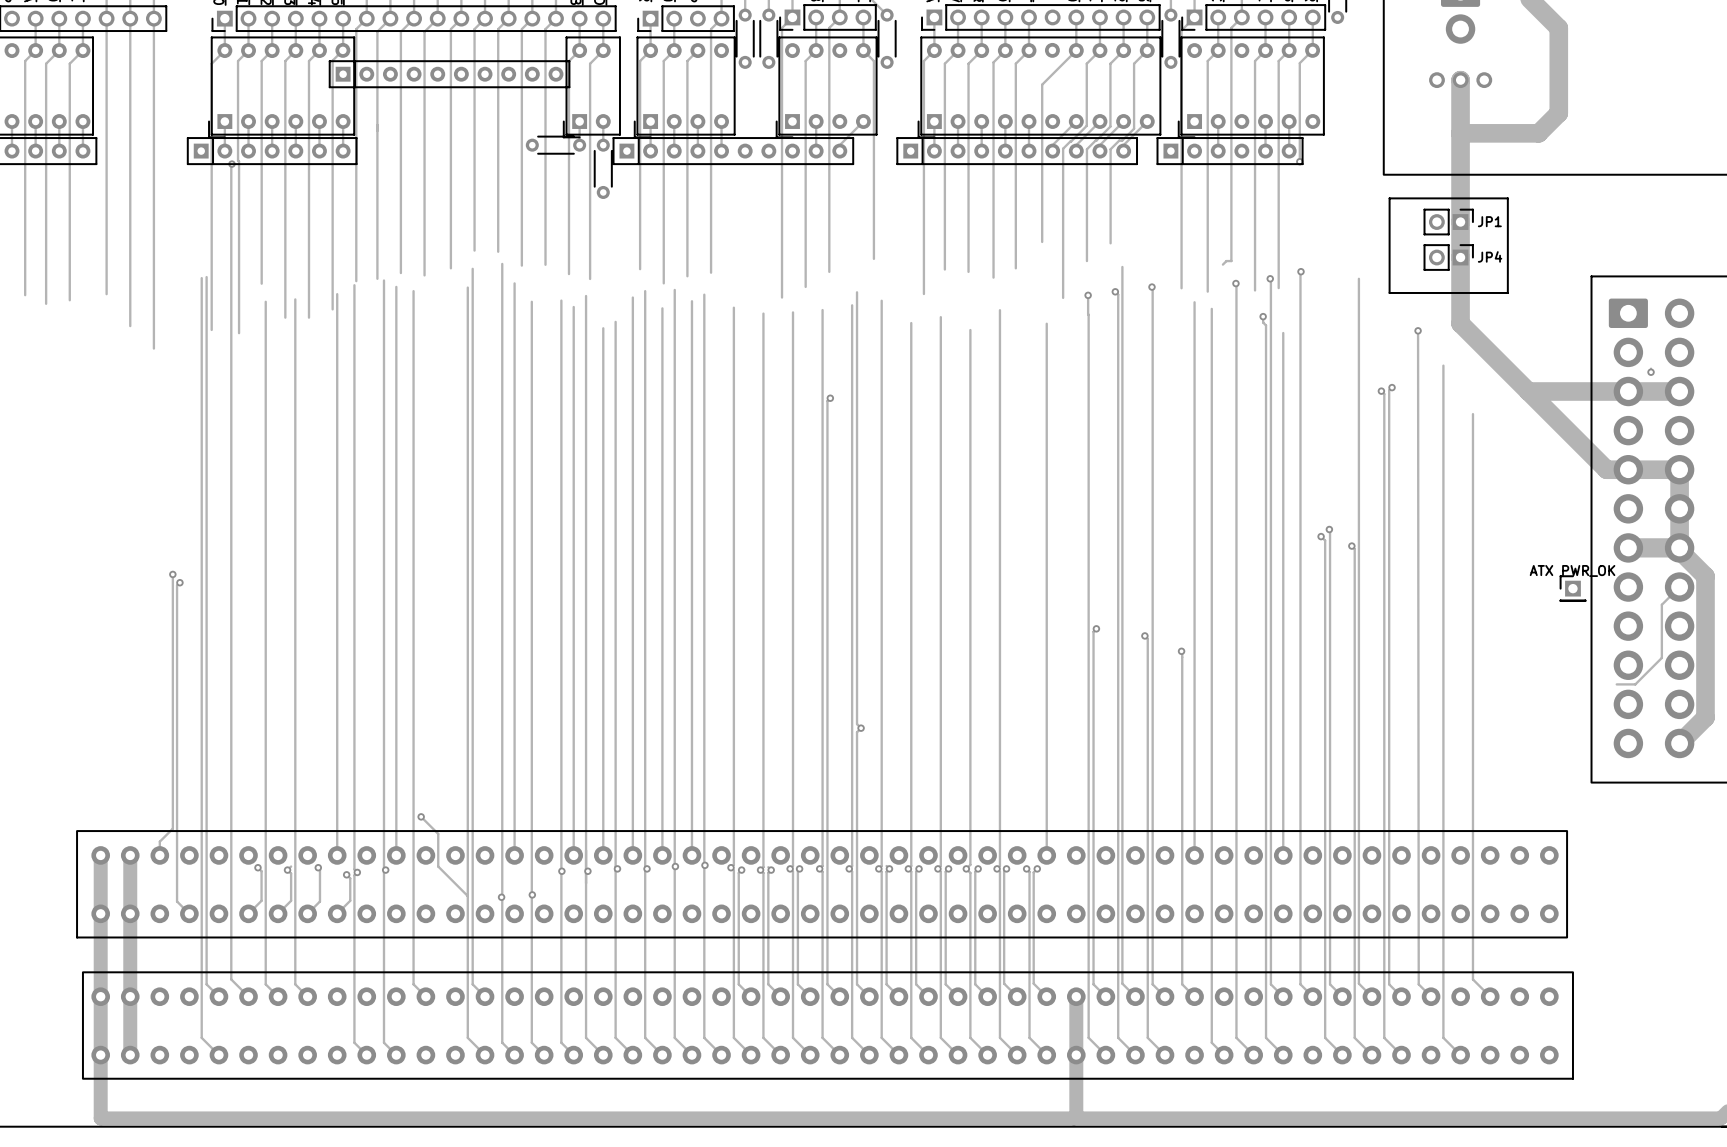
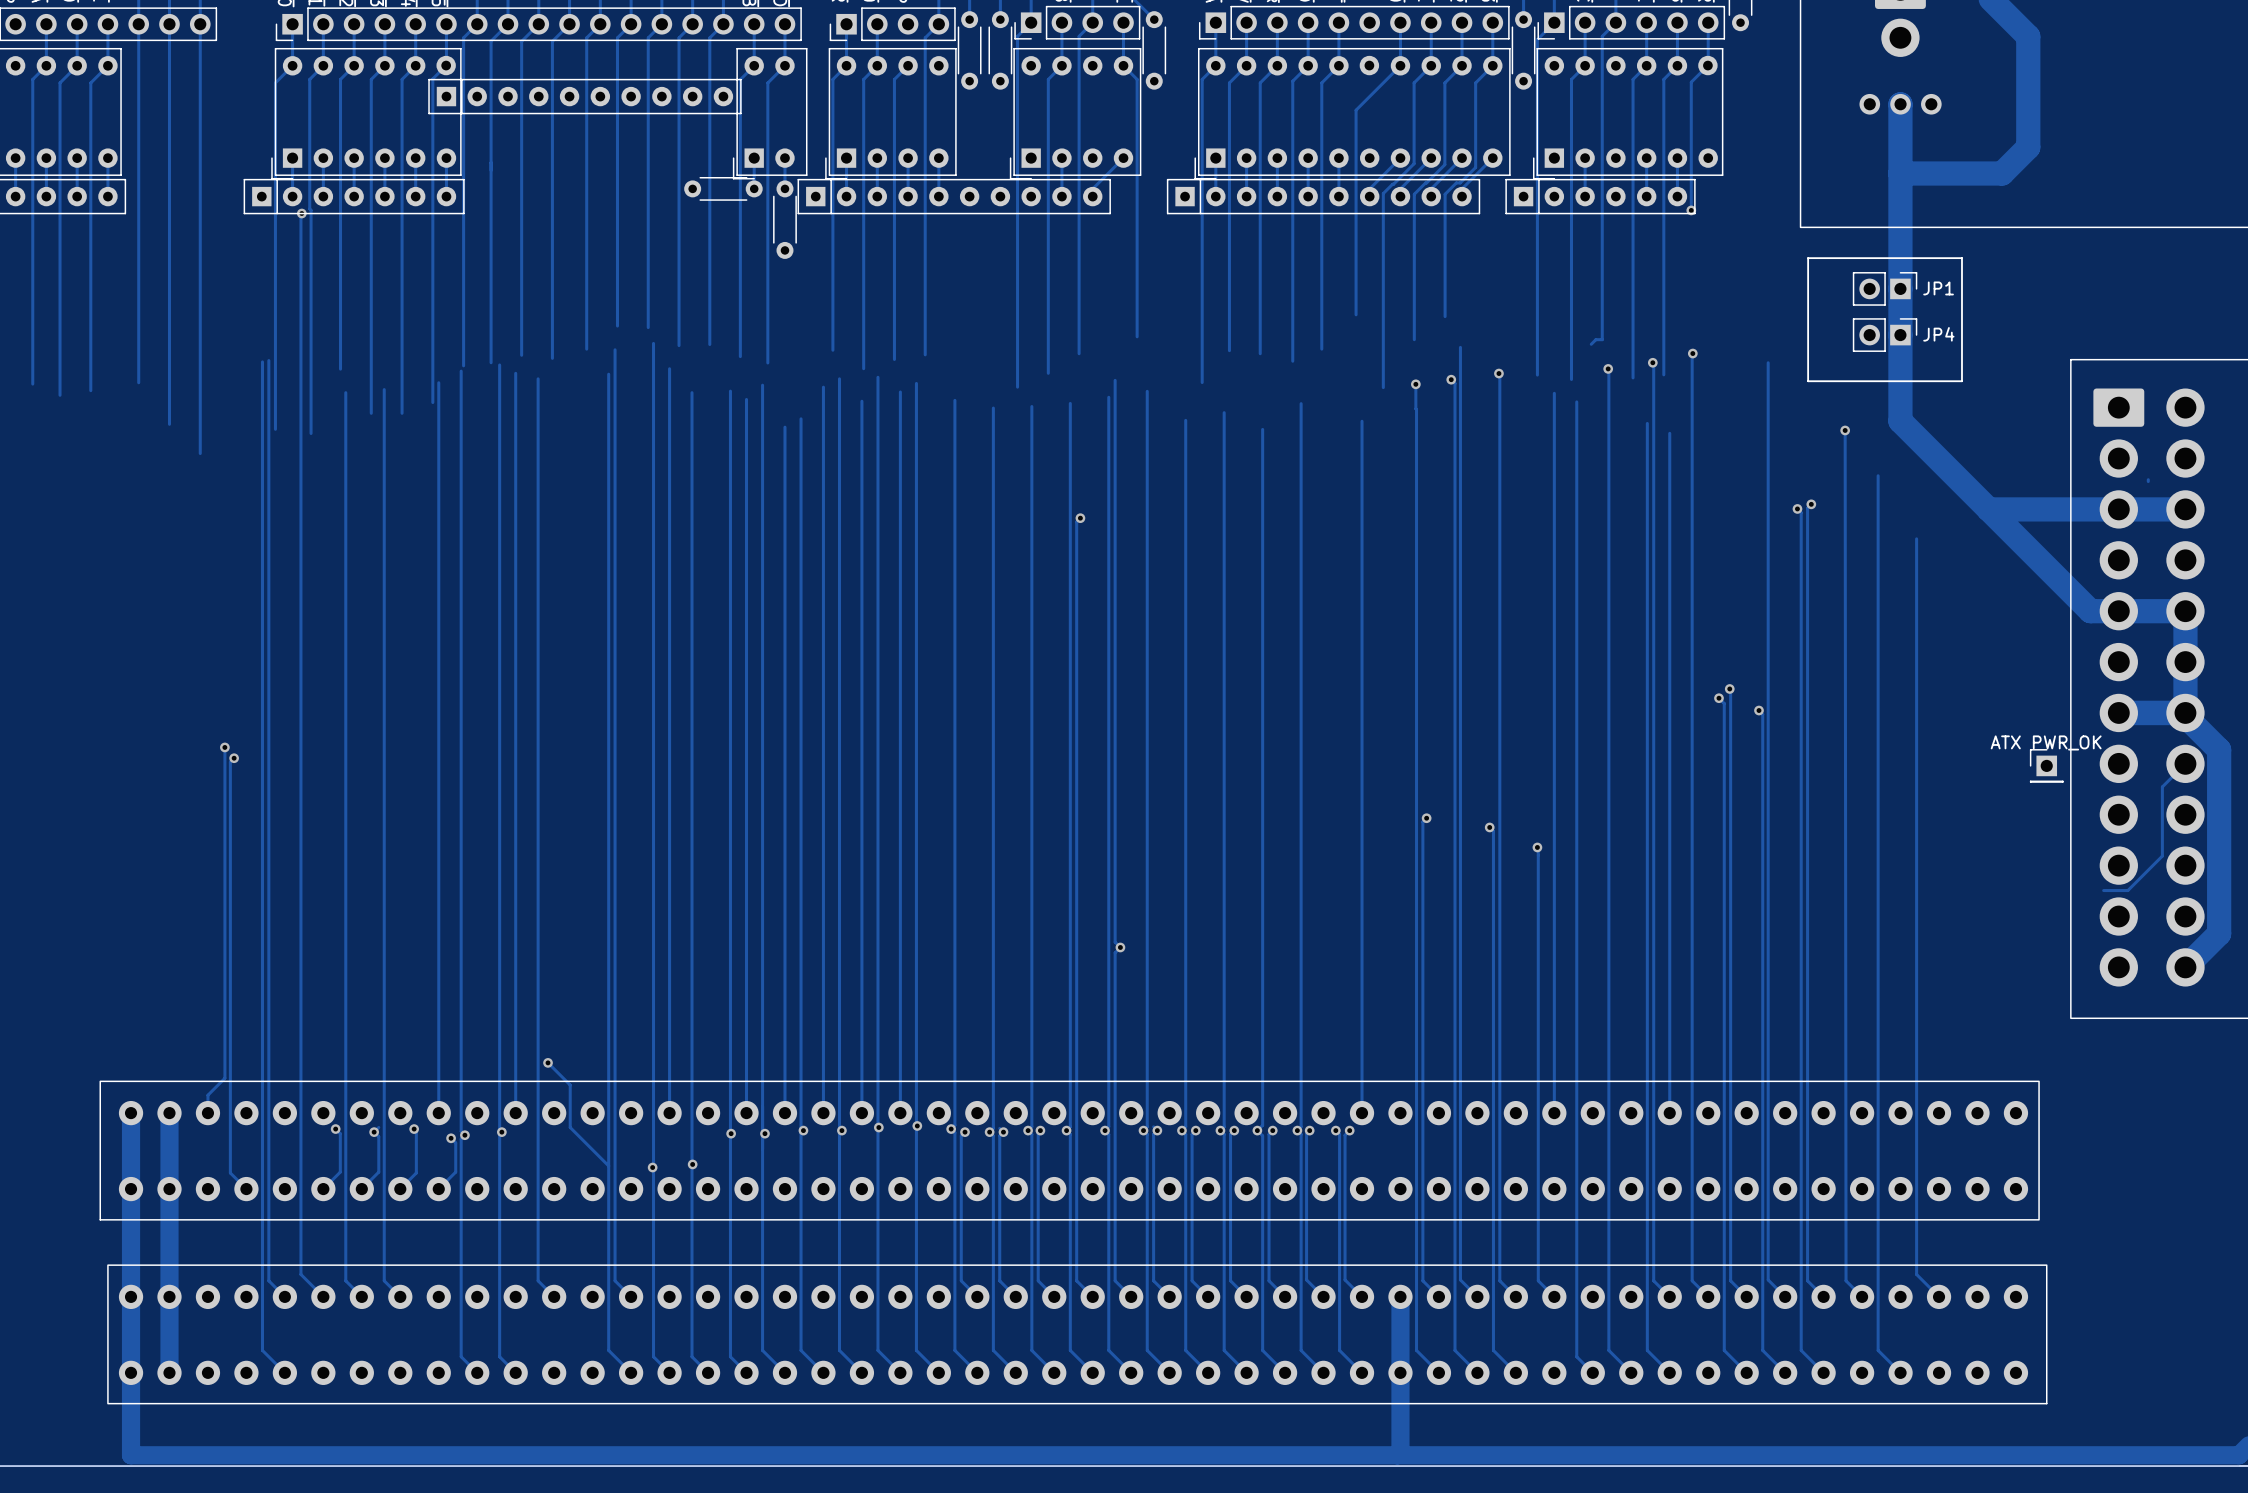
track: (1263, 316) (1263, 322) (1266, 325) -> none
via: (1263, 316) -> none
via: (1651, 372) -> none

